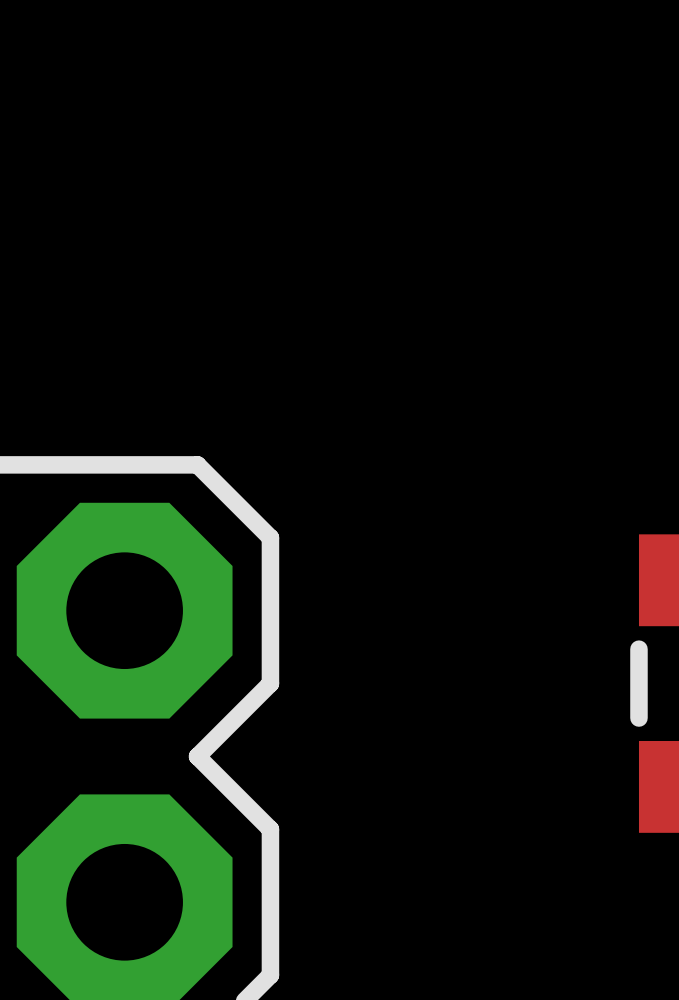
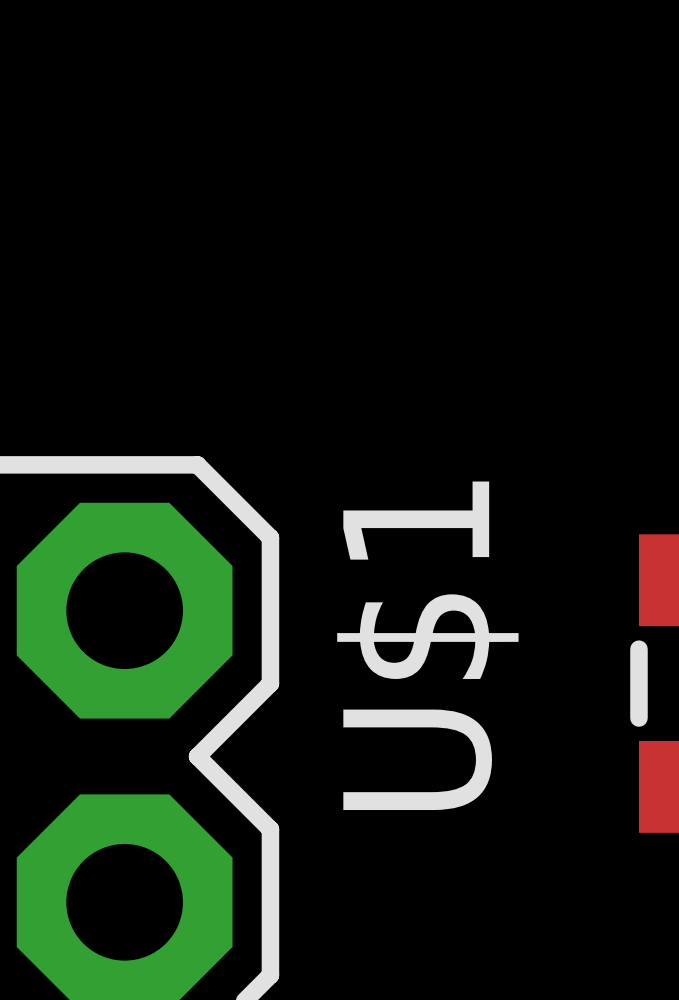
U$1 name: none -> U$1 (427, 645)

